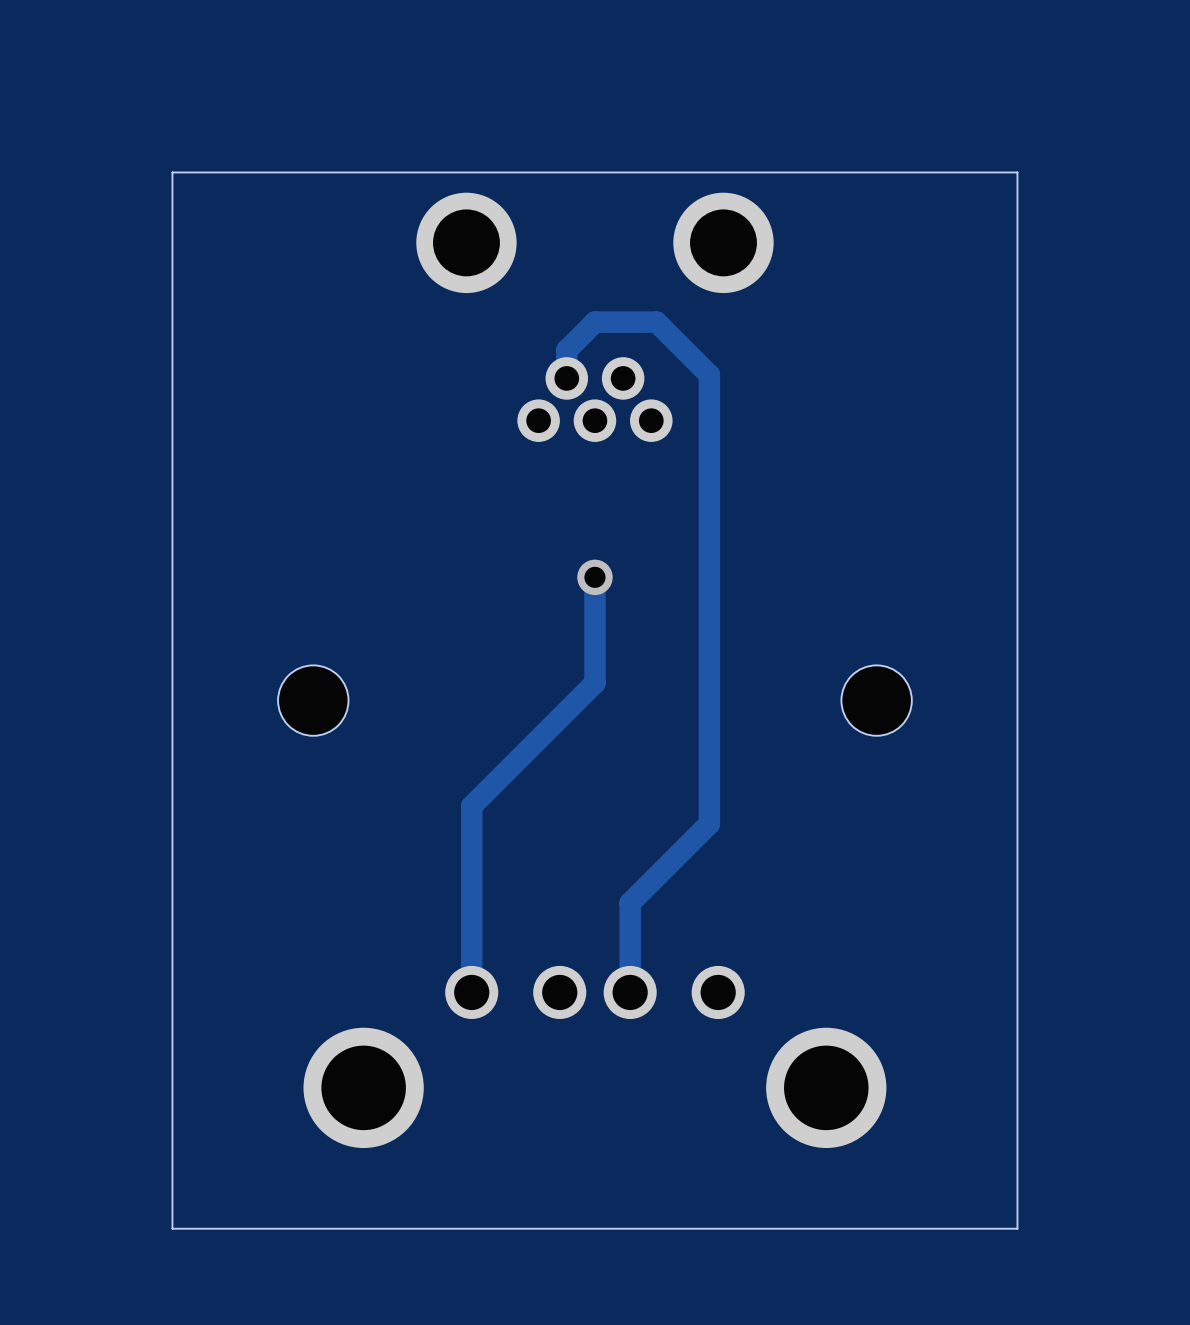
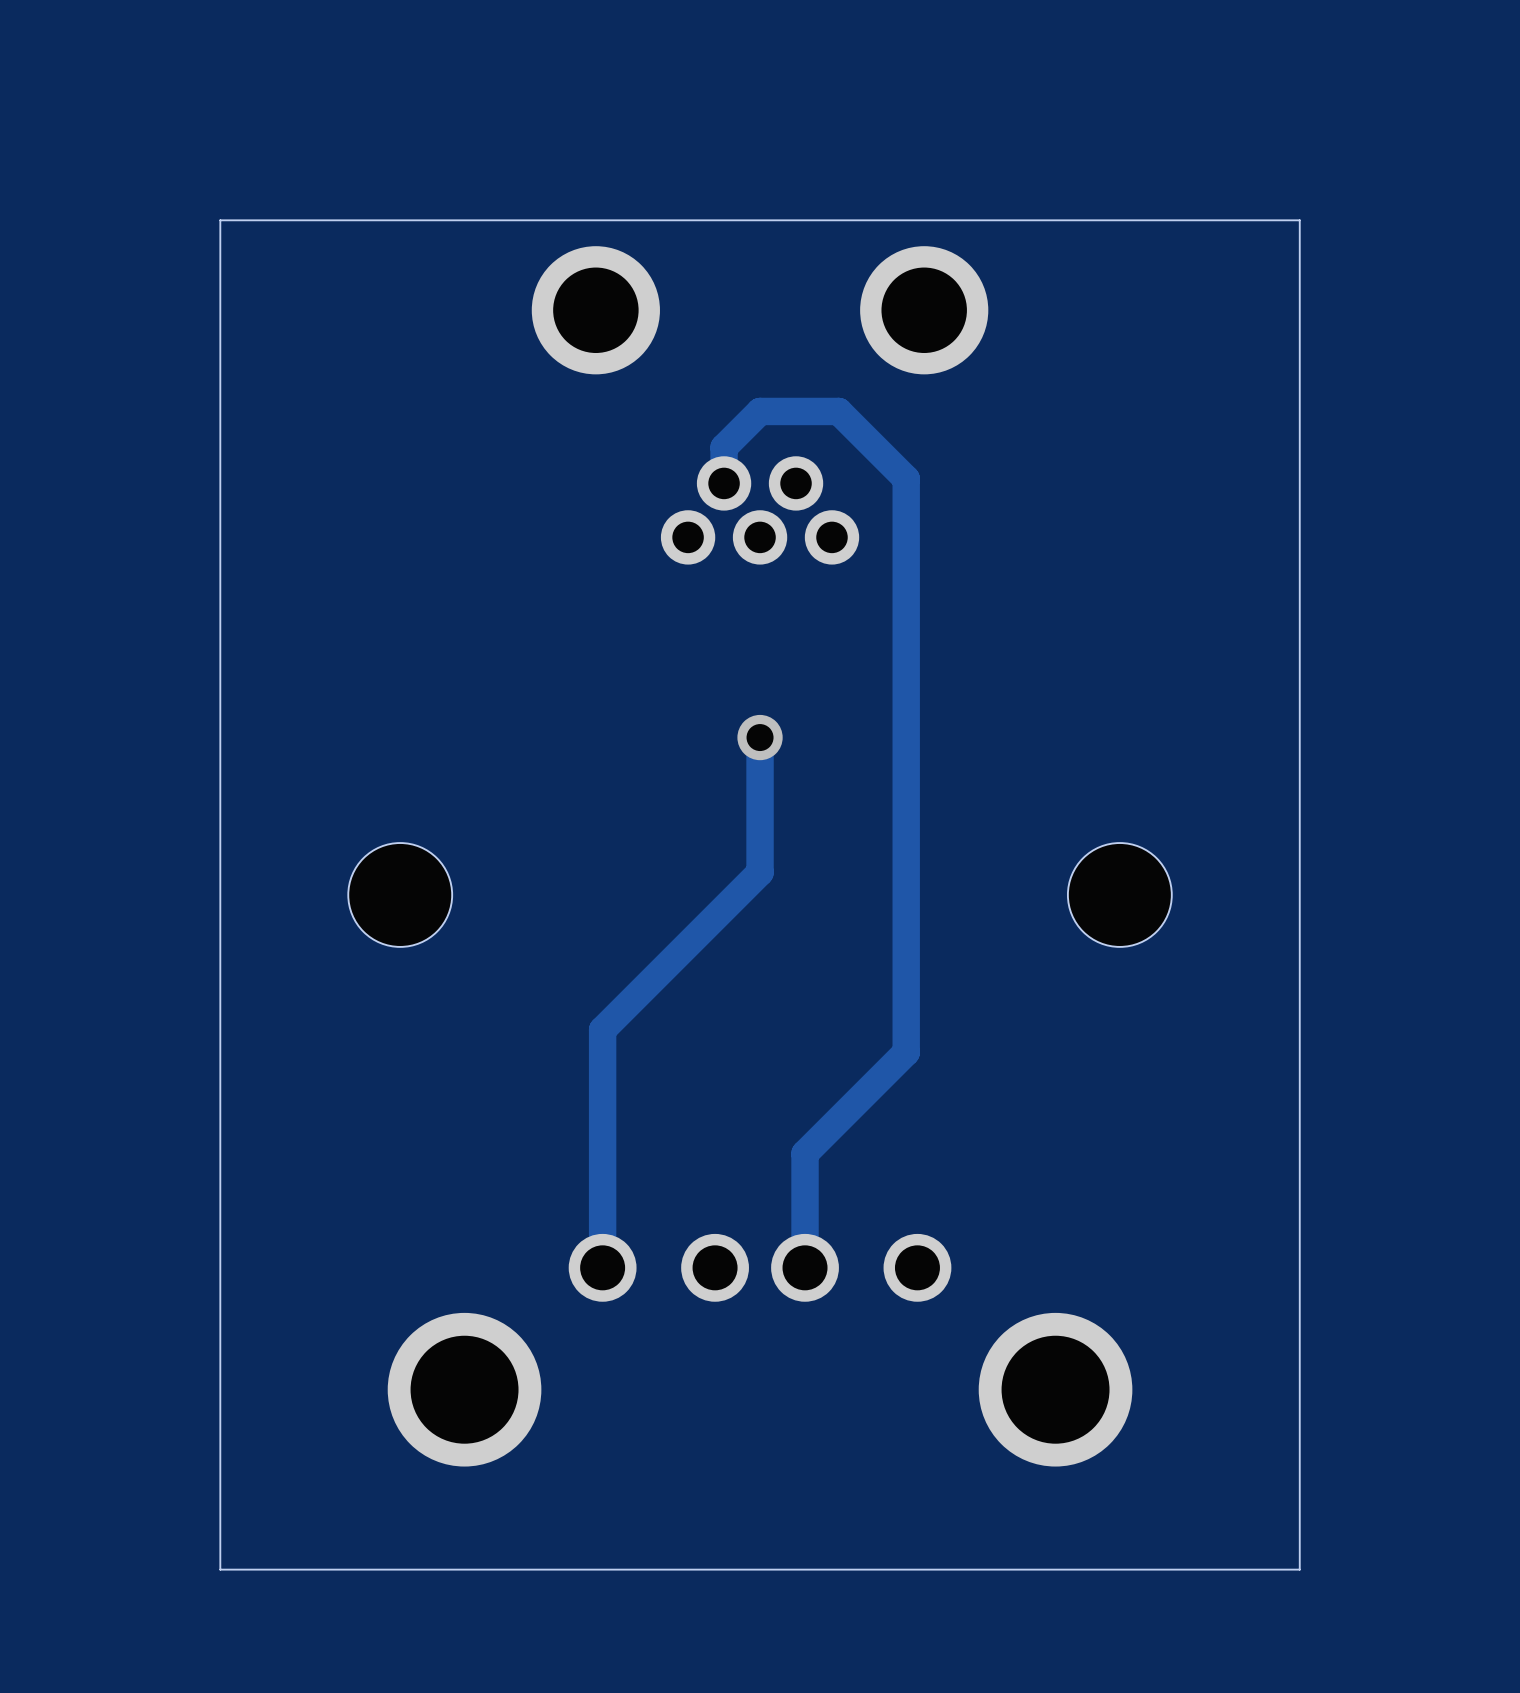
part footprint: [278, 665, 349, 736] -> [348, 843, 453, 947]
part footprint: [841, 665, 912, 736] -> [1067, 843, 1172, 947]

